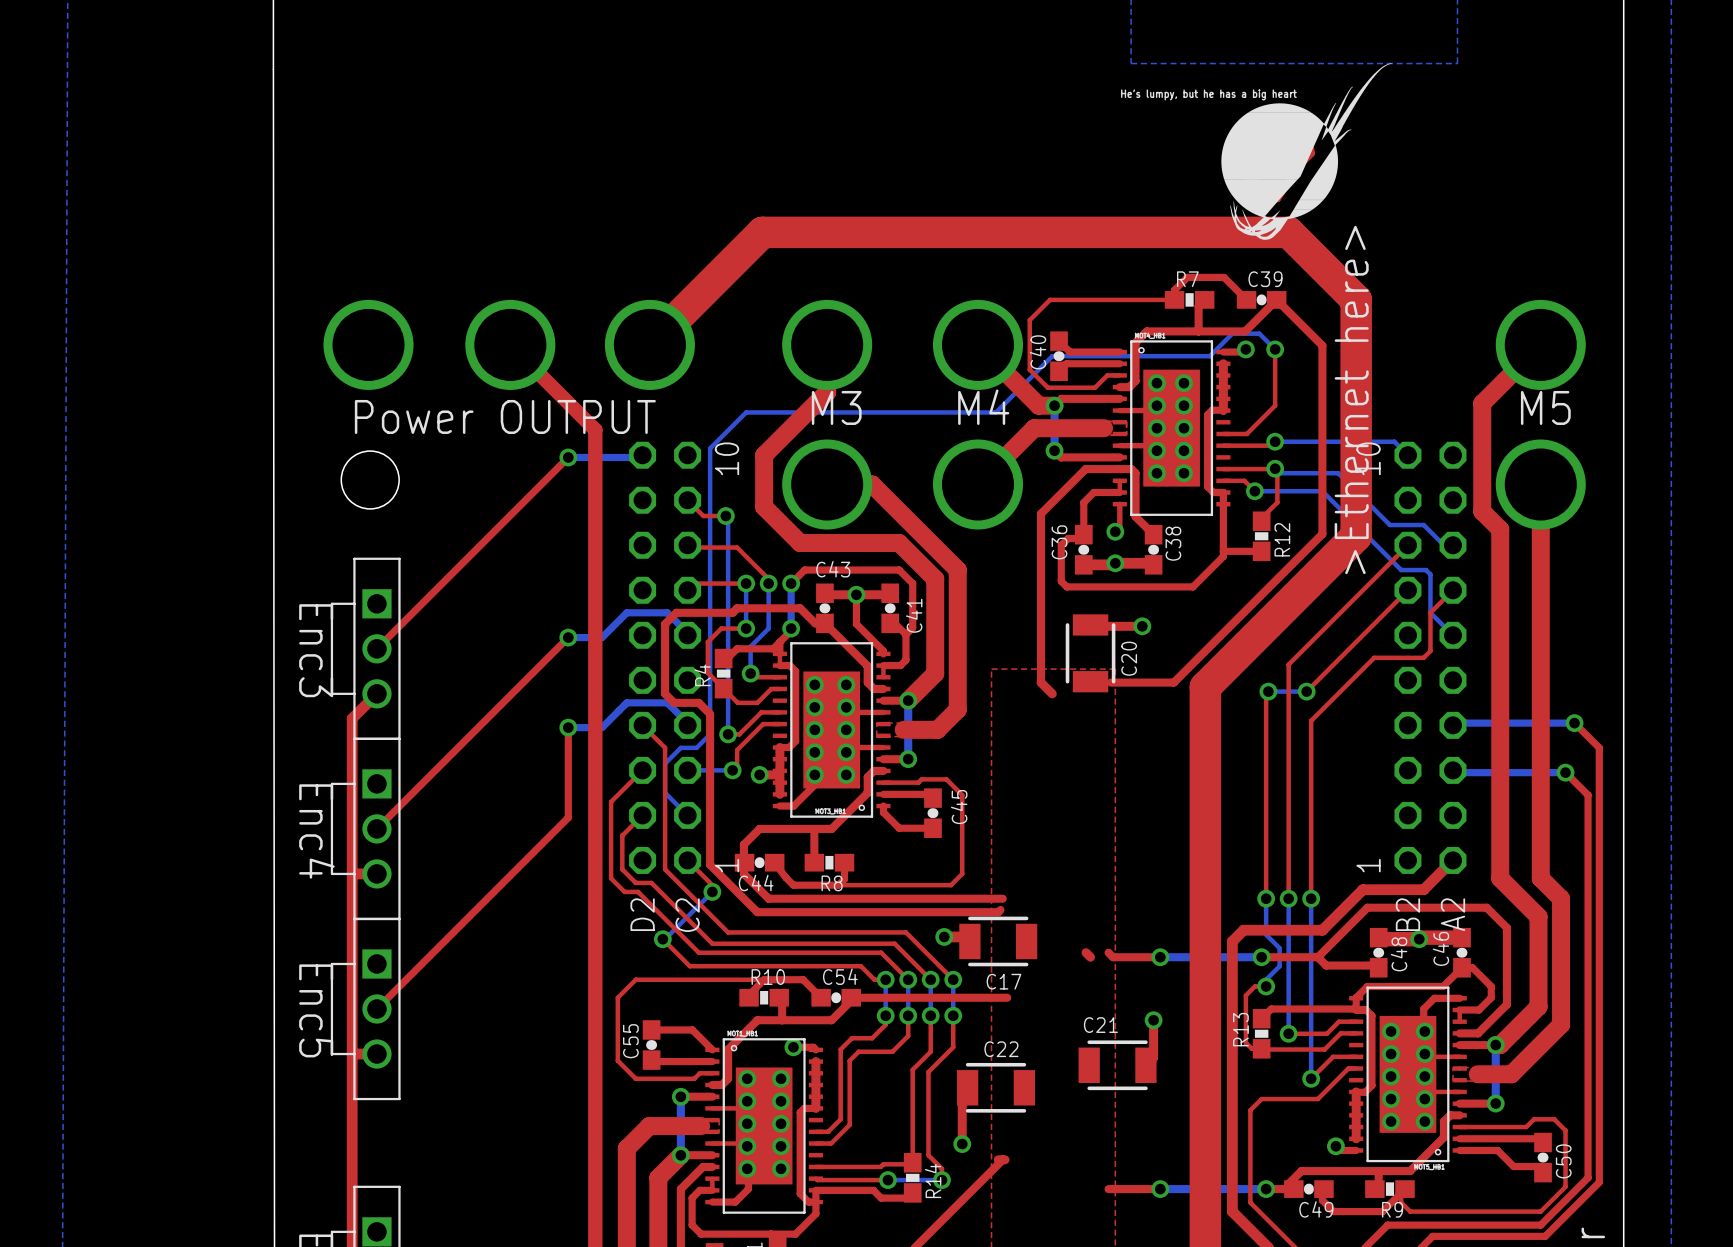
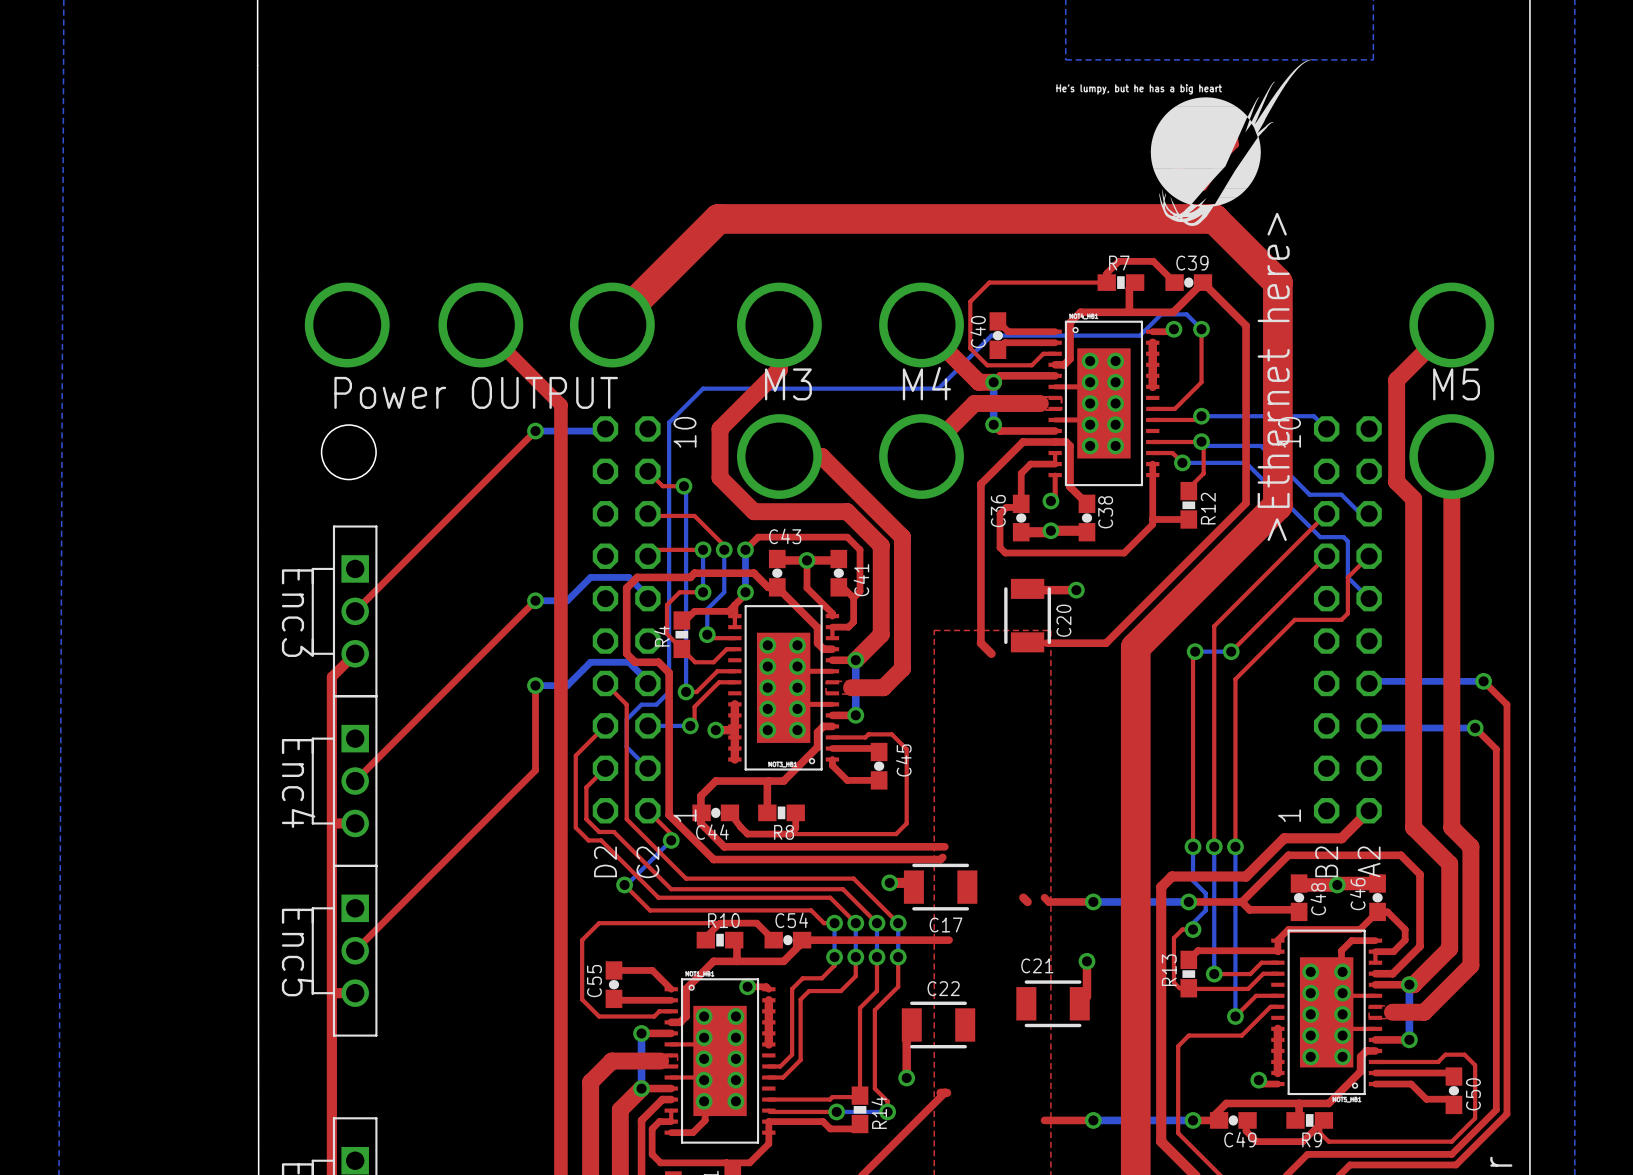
top track: (1223, 410) (1212, 410) (1207, 414) (1207, 486) (1213, 492) (1223, 492) -> none
top track: (779, 665) (789, 665) (795, 671) (795, 741) (789, 747) (779, 747) -> none
top track: (814, 774) (814, 785) (793, 806) (779, 806) -> (734, 748) (734, 759)
top track: (1356, 1009) (1366, 1009) (1371, 1015) (1371, 1085) (1365, 1092) (1356, 1091) -> none
top track: (815, 1108) (804, 1108) (800, 1112) (800, 1193) (808, 1202) (815, 1202) -> none

